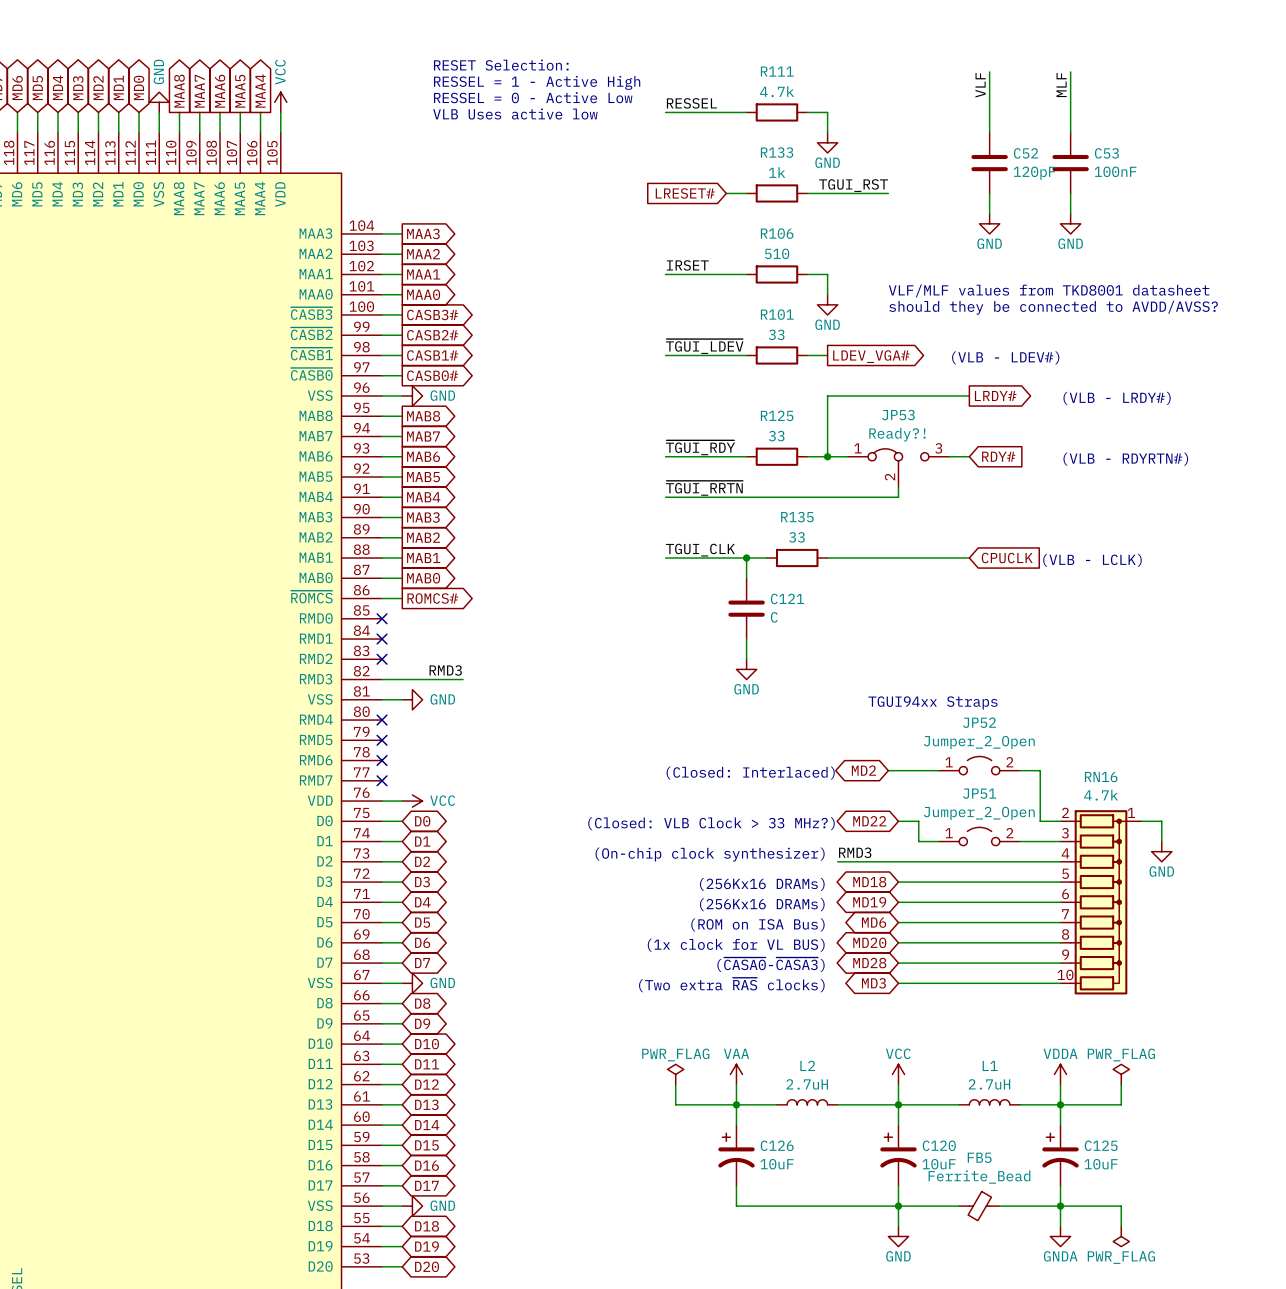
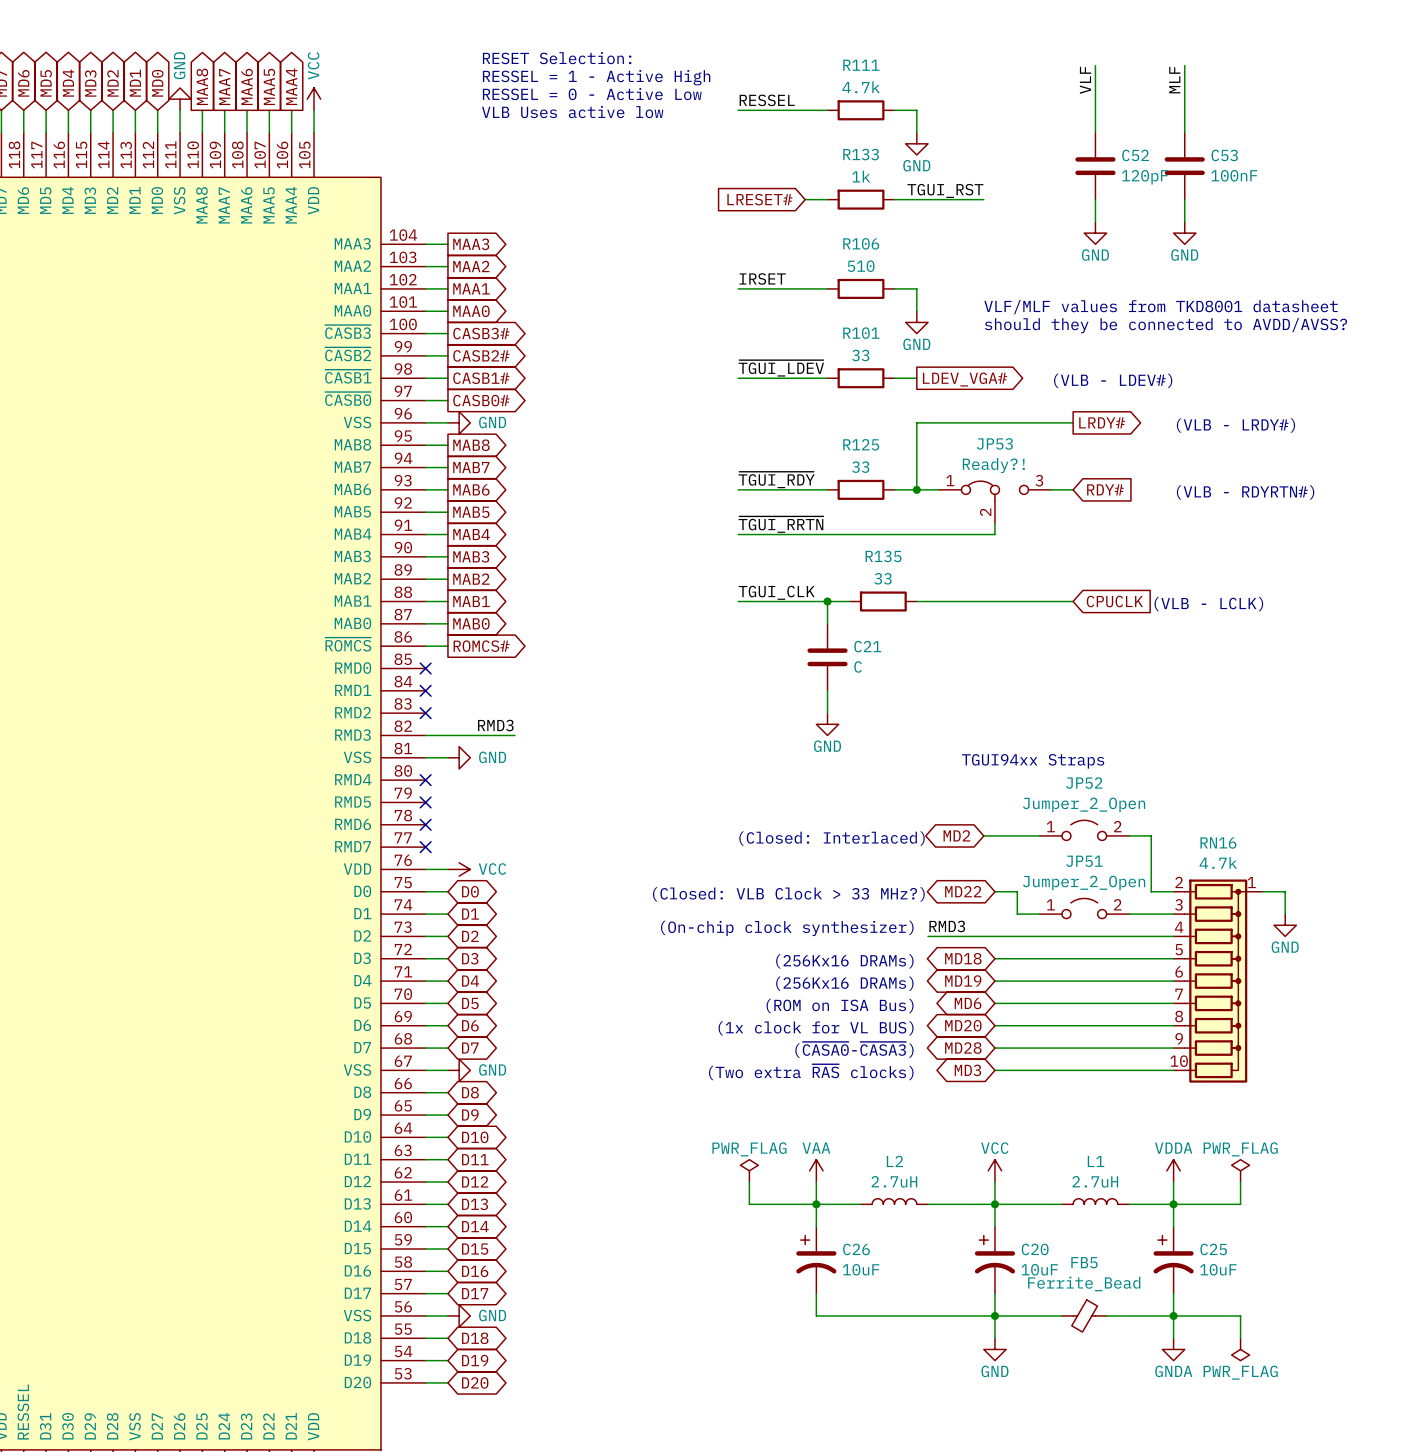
C121 name: C121 (787, 598) -> C21 (867, 646)
C126 name: C126 (777, 1145) -> C26 (856, 1249)
C120 name: C120 (939, 1145) -> C20 (1035, 1249)
C125 name: C125 (1101, 1145) -> C25 (1213, 1249)

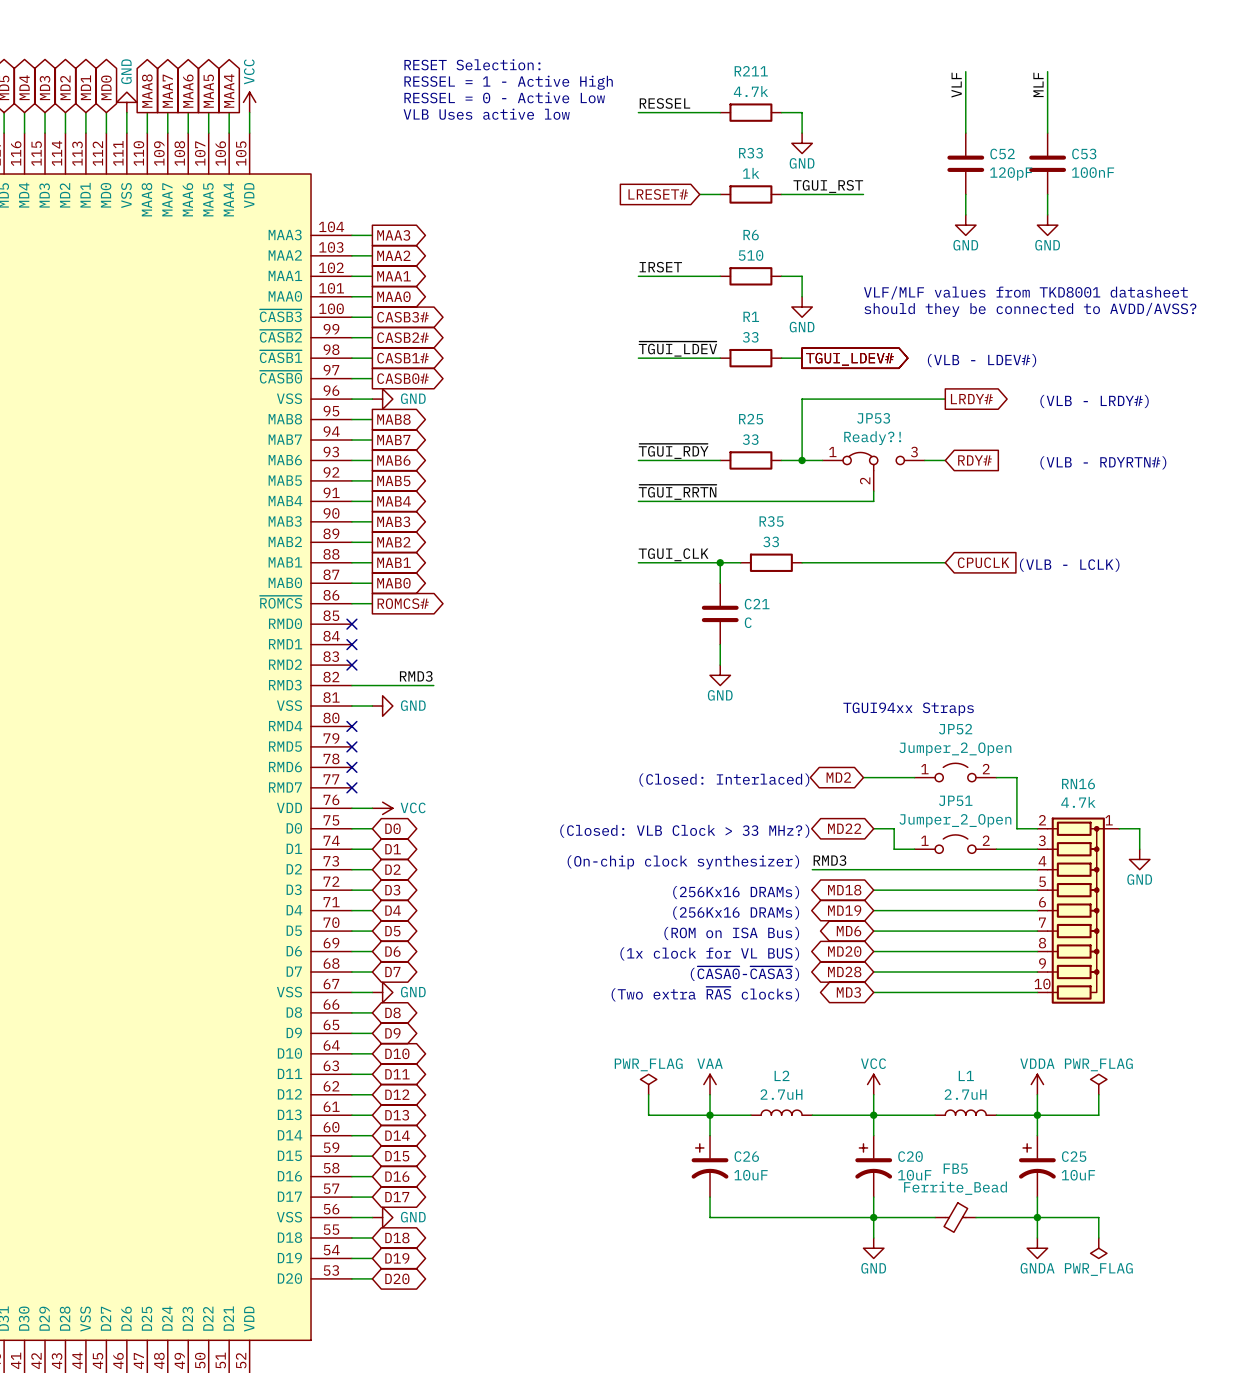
R111 name: R111 (861, 65) -> R211 (751, 71)
R133 name: R133 (861, 154) -> R33 (750, 153)
R106 name: R106 (861, 243) -> R6 (751, 235)
R101 name: R101 (861, 333) -> R1 (751, 316)
global label: LDEV_VGA# (965, 379) -> TGUI_LDEV# (849, 359)
R125 name: R125 (861, 444) -> R25 (751, 419)
R135 name: R135 (883, 556) -> R35 (771, 521)

